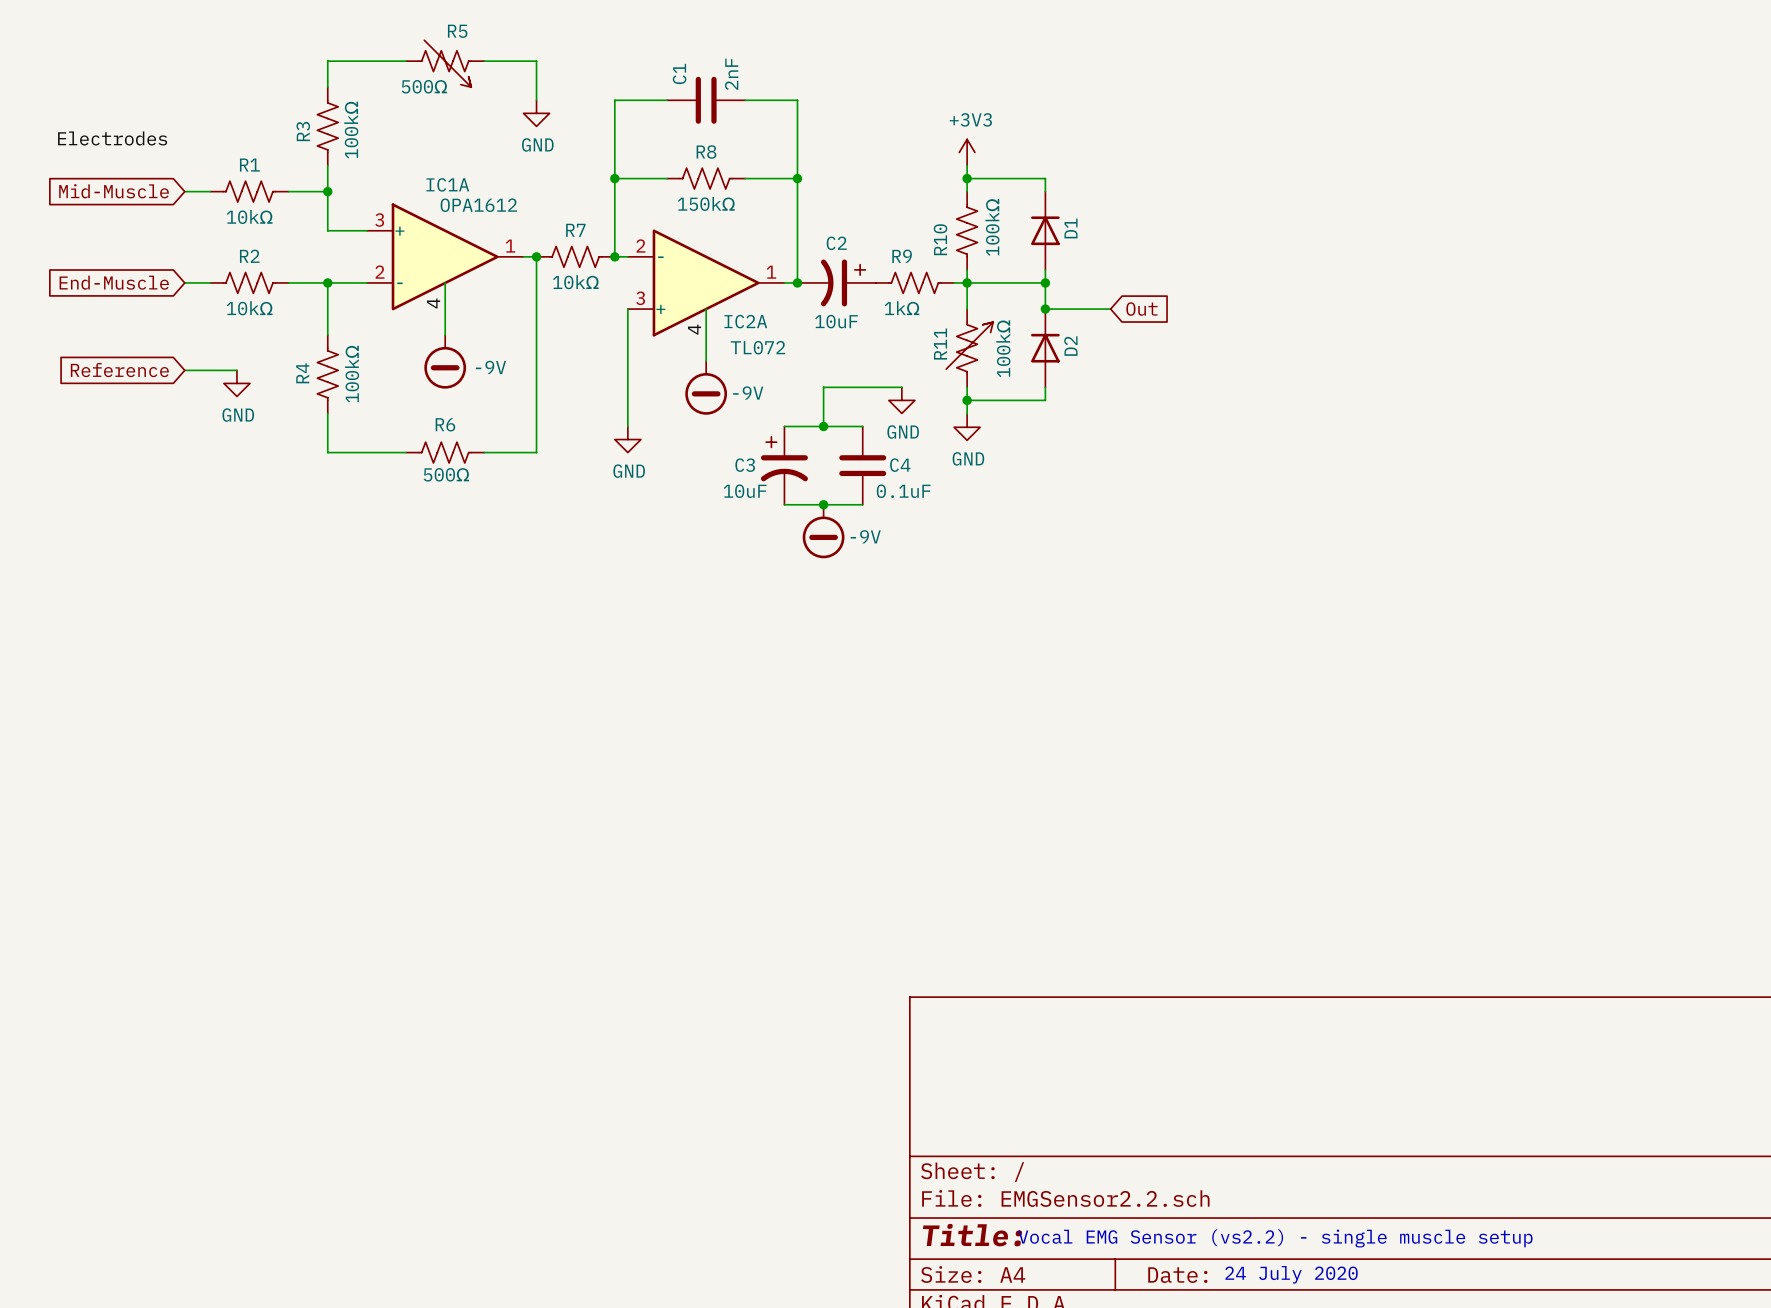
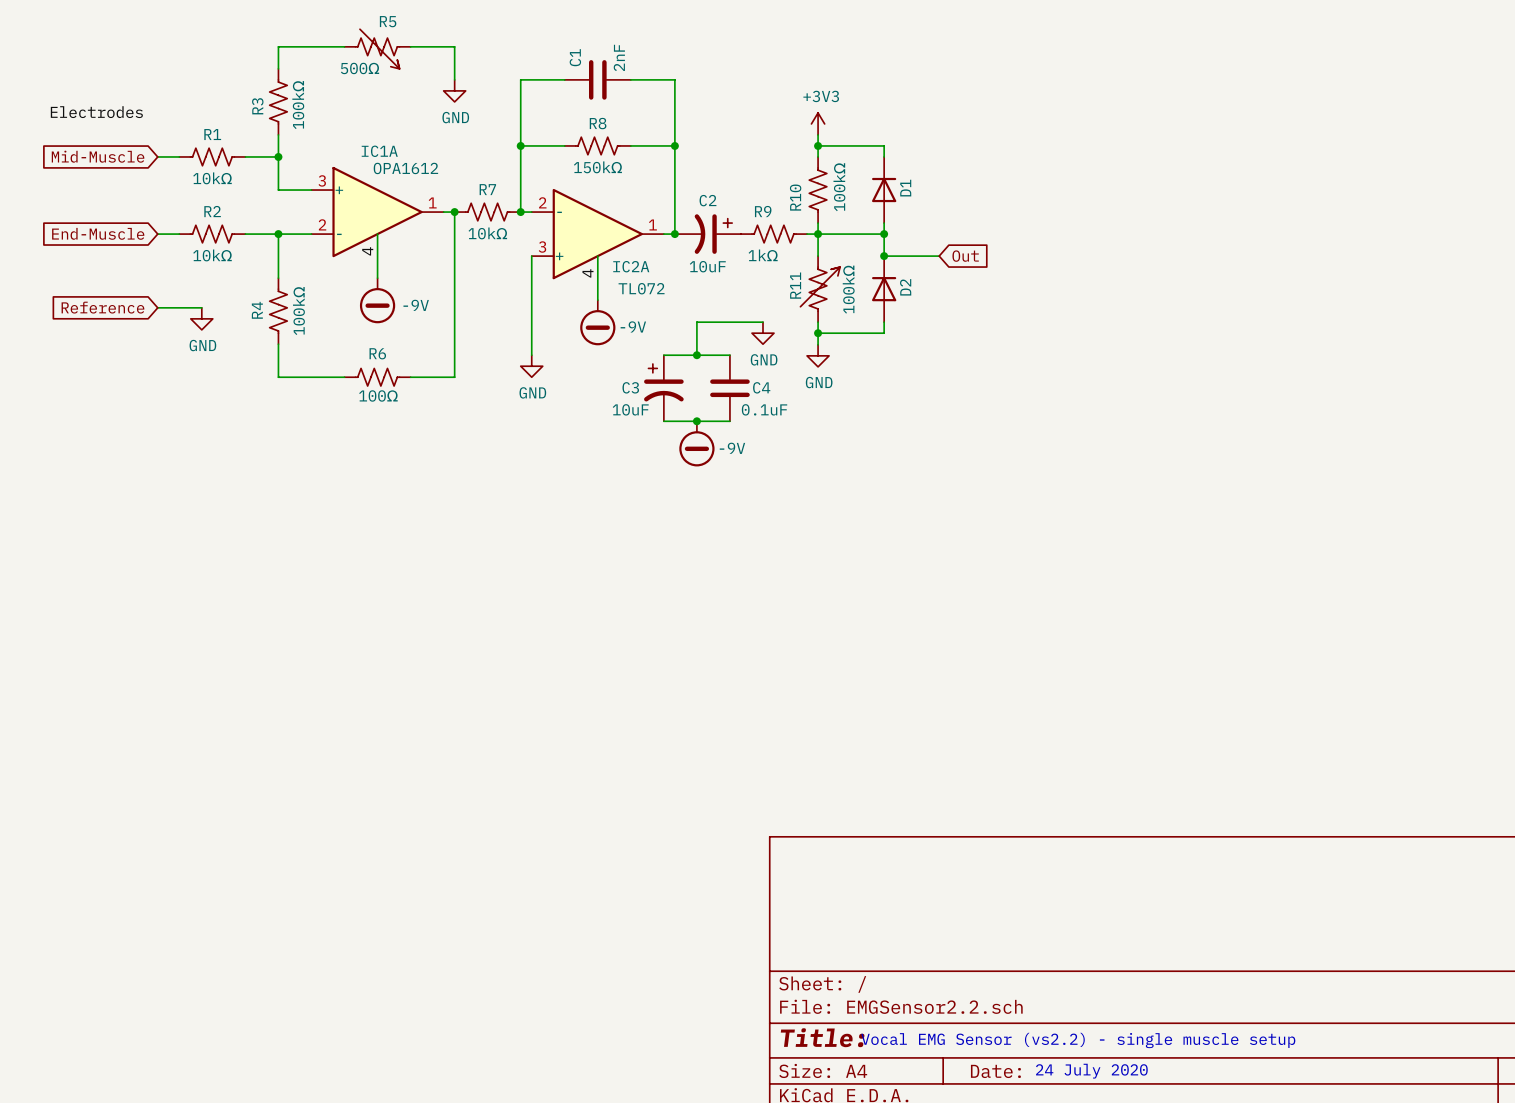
R6 value: 500Ω (446, 474) -> 100Ω (378, 395)

